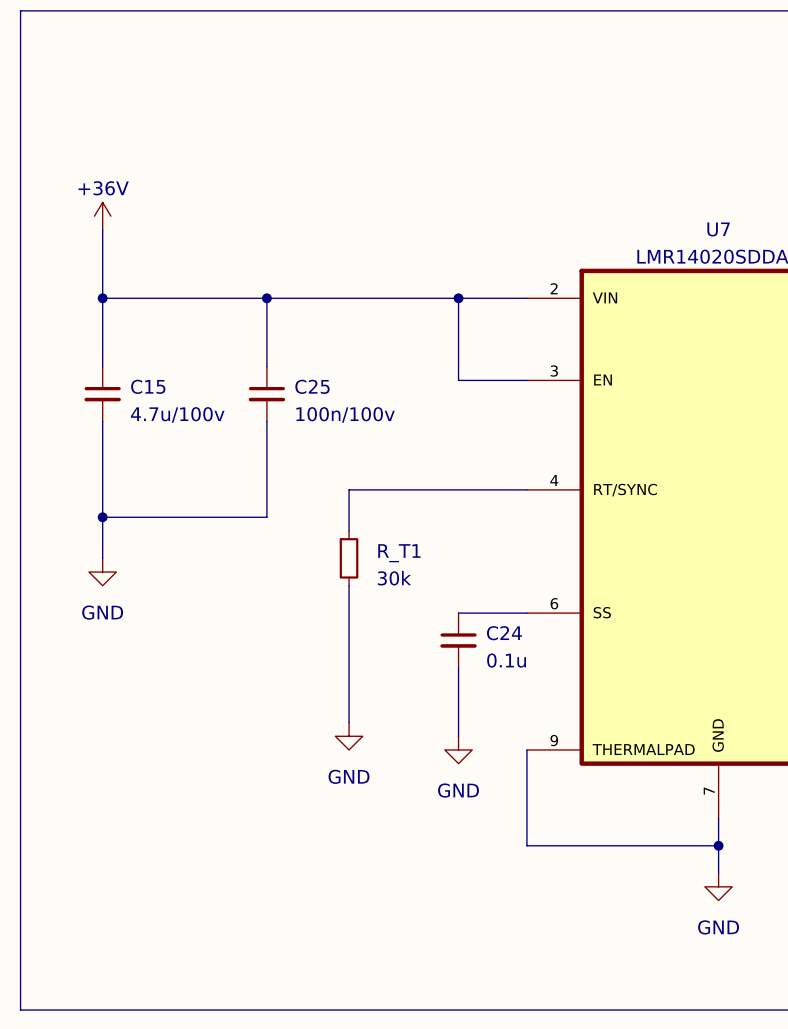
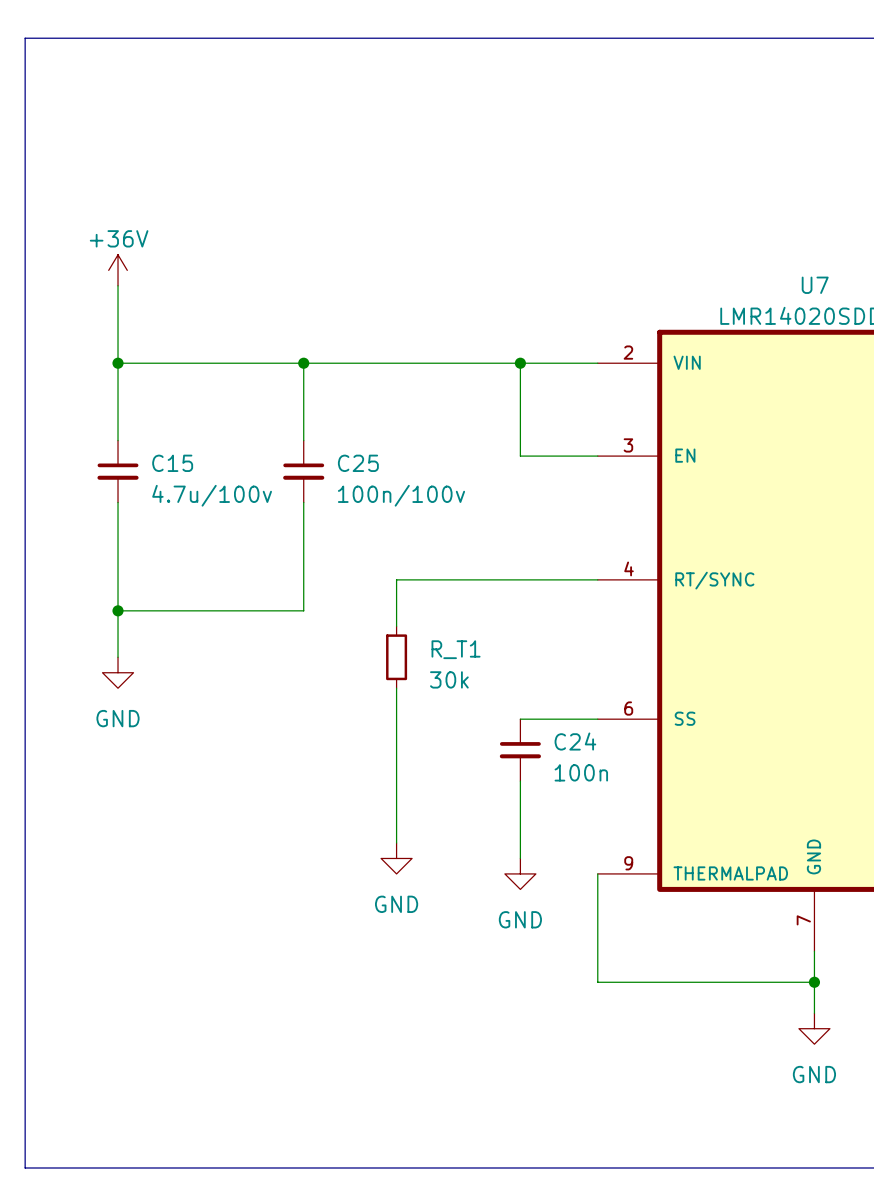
C24 value: 0.1u (506, 660) -> 100n (581, 772)

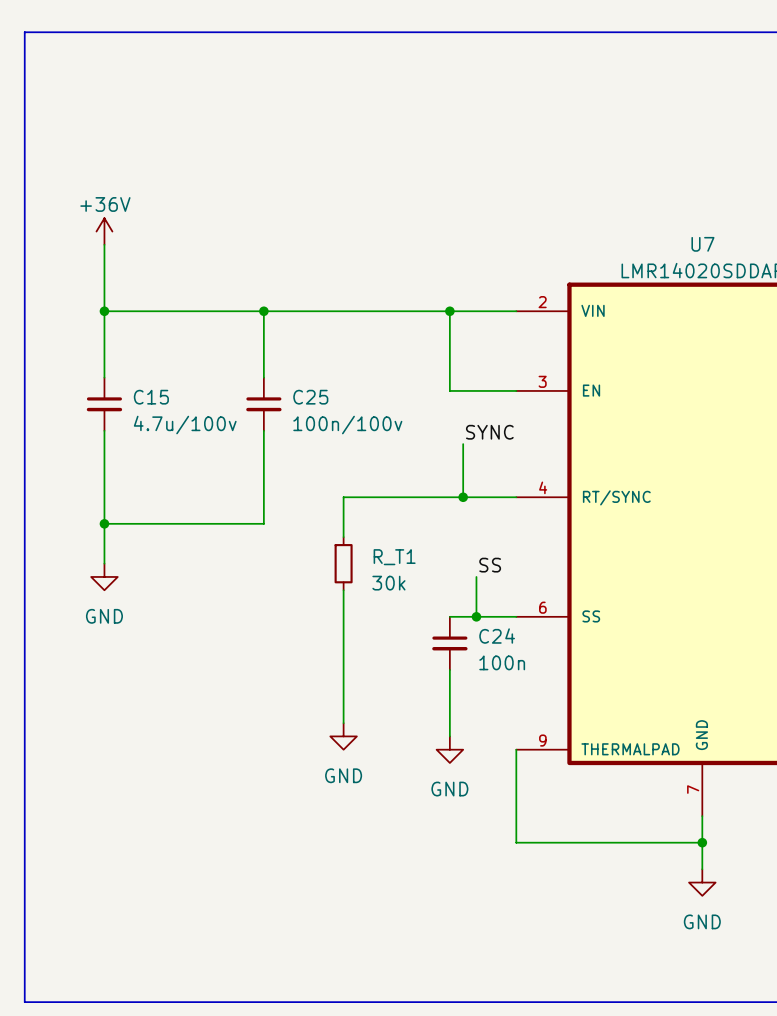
label: none -> SYNC (489, 432)
wire: none -> (463, 444) (463, 497)
junction: none -> (463, 497)
label: none -> SS (490, 565)
wire: none -> (476, 576) (476, 616)
junction: none -> (476, 616)

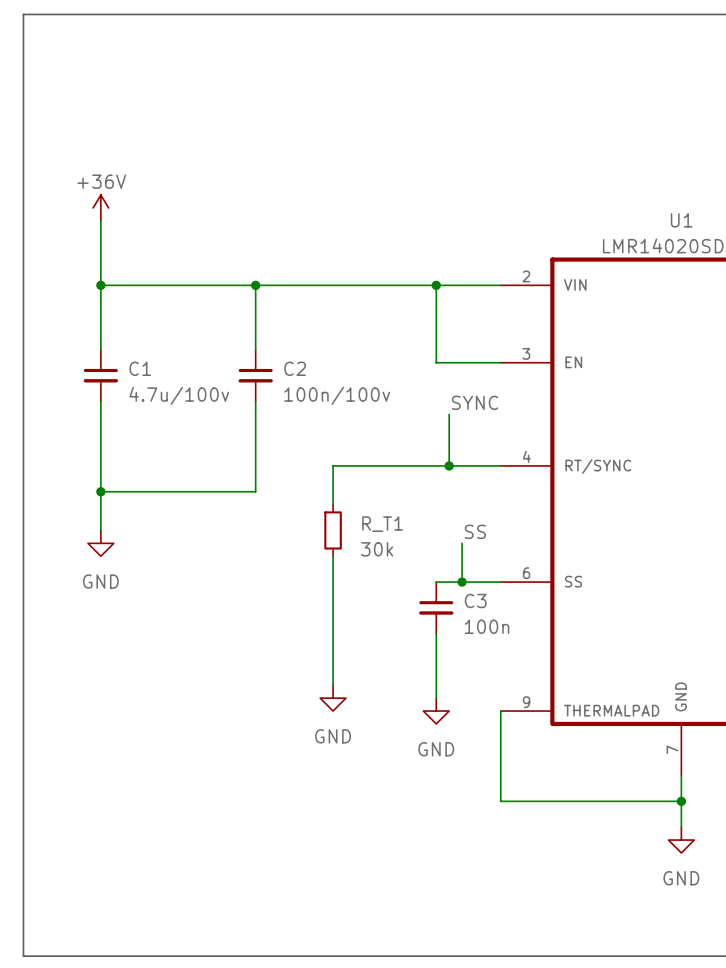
U7 name: U7 (702, 244) -> U1 (681, 220)
C15 name: C15 (151, 397) -> C1 (140, 368)
C25 name: C25 (310, 397) -> C2 (295, 368)
C24 name: C24 (497, 636) -> C3 (475, 600)

